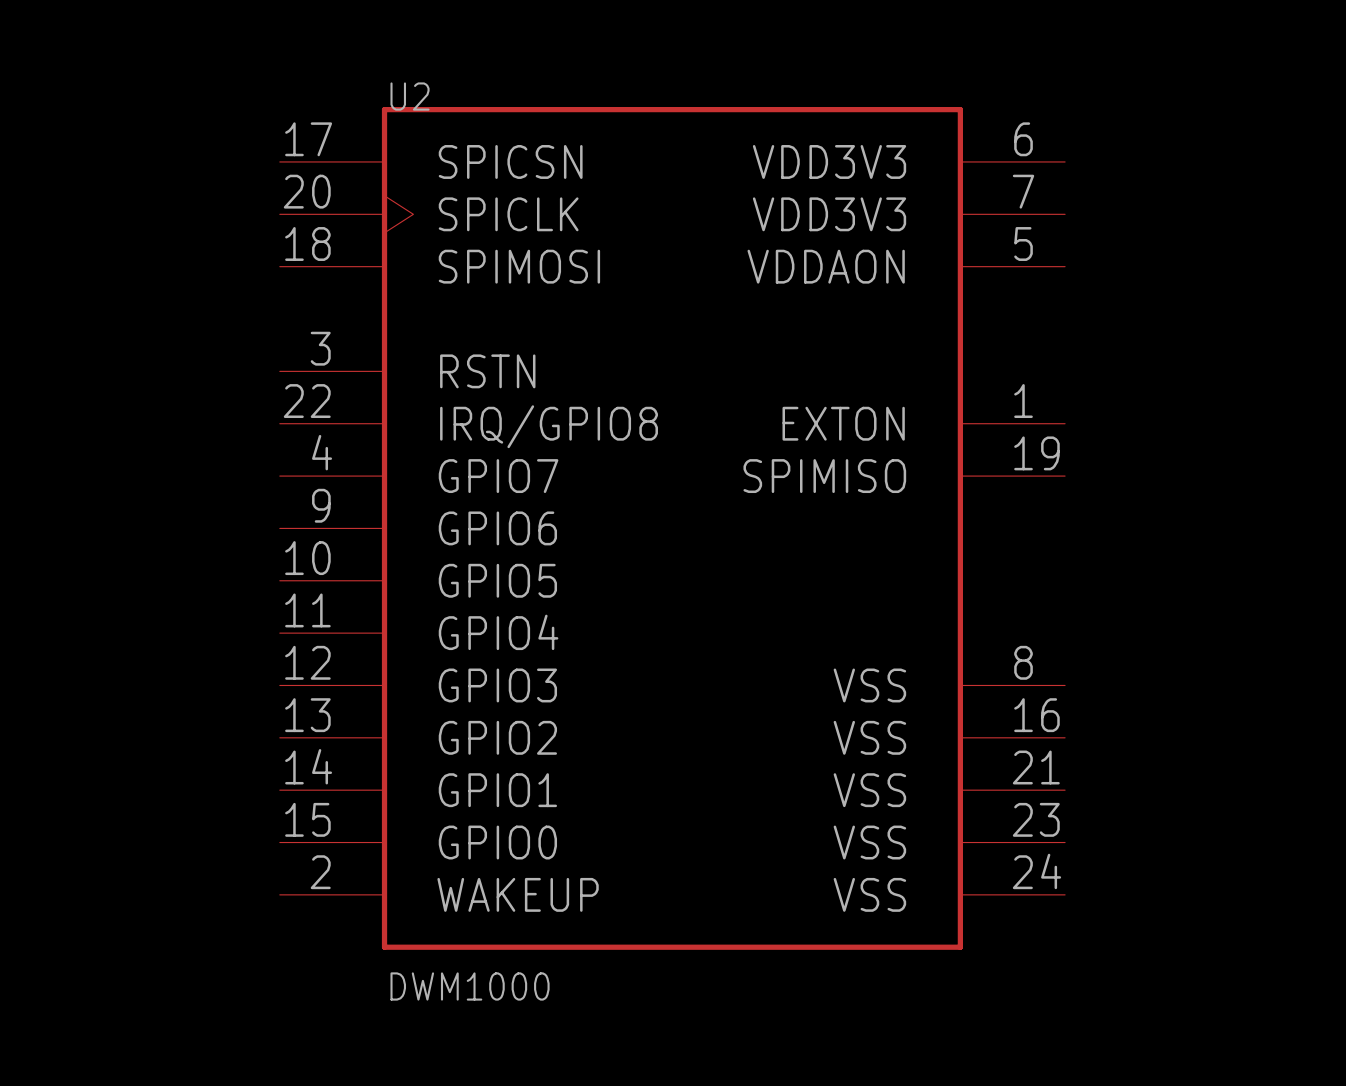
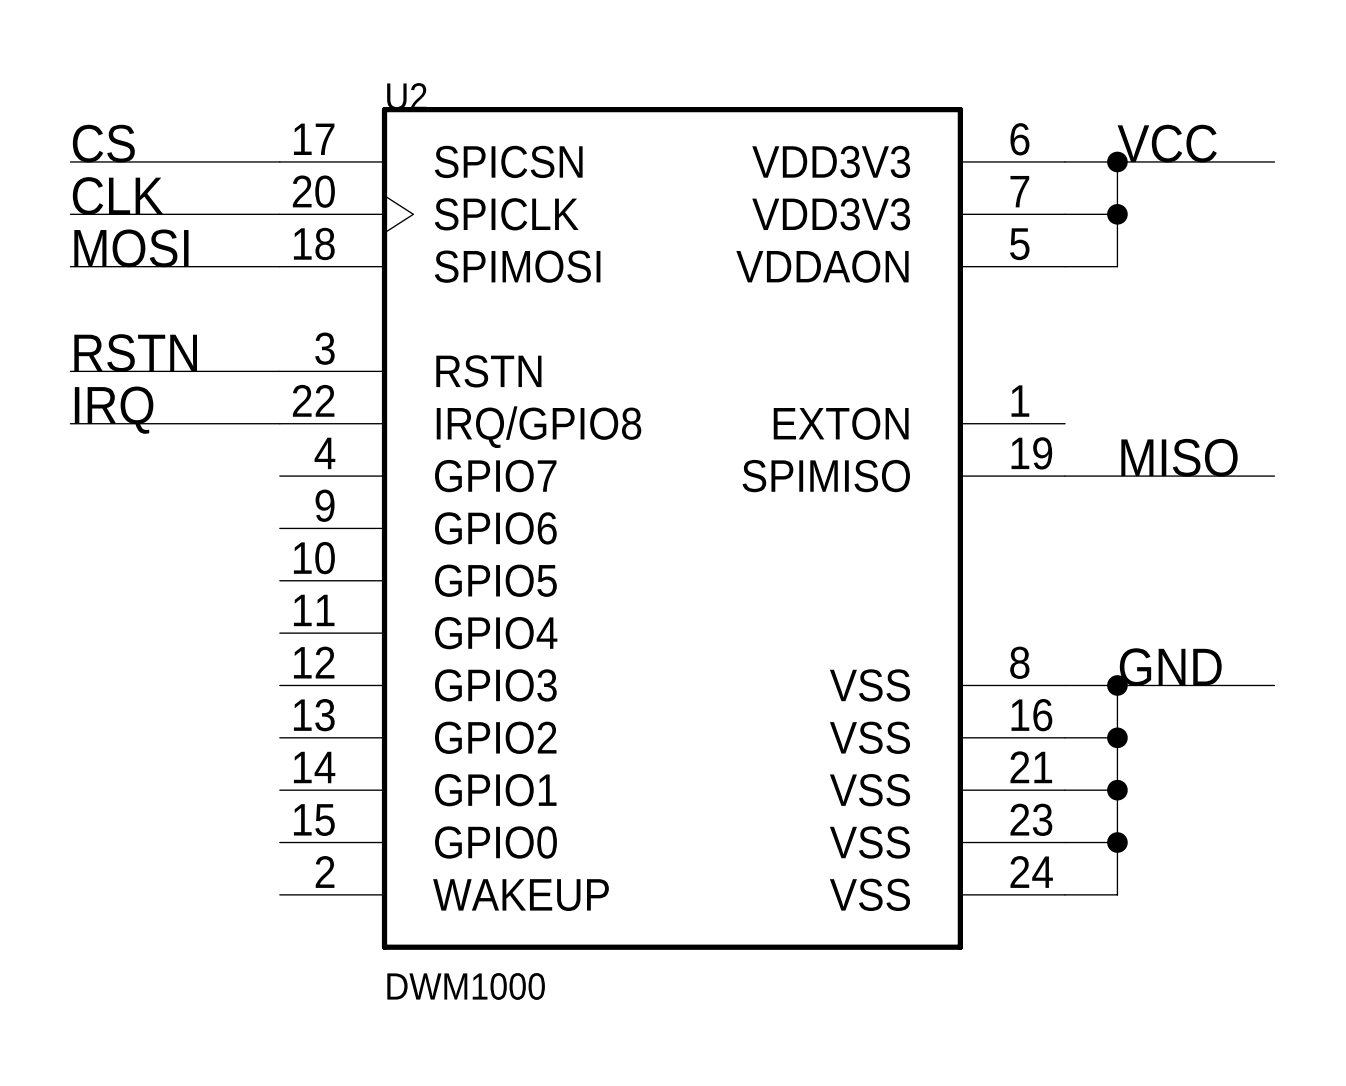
label: none -> CS (103, 143)
label: none -> VCC (1167, 143)
wire: none -> (70, 161) (279, 161)
wire: none -> (1065, 161) (1274, 161)
wire: none -> (1117, 161) (1117, 266) (1065, 266)
junction: none -> (1117, 161)
label: none -> CLK (117, 195)
wire: none -> (70, 214) (279, 214)
wire: none -> (1065, 214) (1117, 214)
junction: none -> (1117, 214)
label: none -> MOSI (131, 248)
wire: none -> (70, 266) (279, 266)
label: none -> RSTN (135, 353)
wire: none -> (70, 371) (279, 371)
label: none -> IRQ (114, 410)
wire: none -> (70, 423) (279, 423)
label: none -> MISO (1179, 457)
wire: none -> (1065, 476) (1274, 476)
label: none -> GND (1170, 667)
wire: none -> (1065, 685) (1274, 685)
wire: none -> (1117, 685) (1117, 894) (1065, 894)
junction: none -> (1117, 685)
wire: none -> (1065, 737) (1117, 737)
junction: none -> (1117, 737)
wire: none -> (1065, 790) (1117, 790)
junction: none -> (1117, 790)
wire: none -> (1065, 842) (1117, 842)
junction: none -> (1117, 842)

